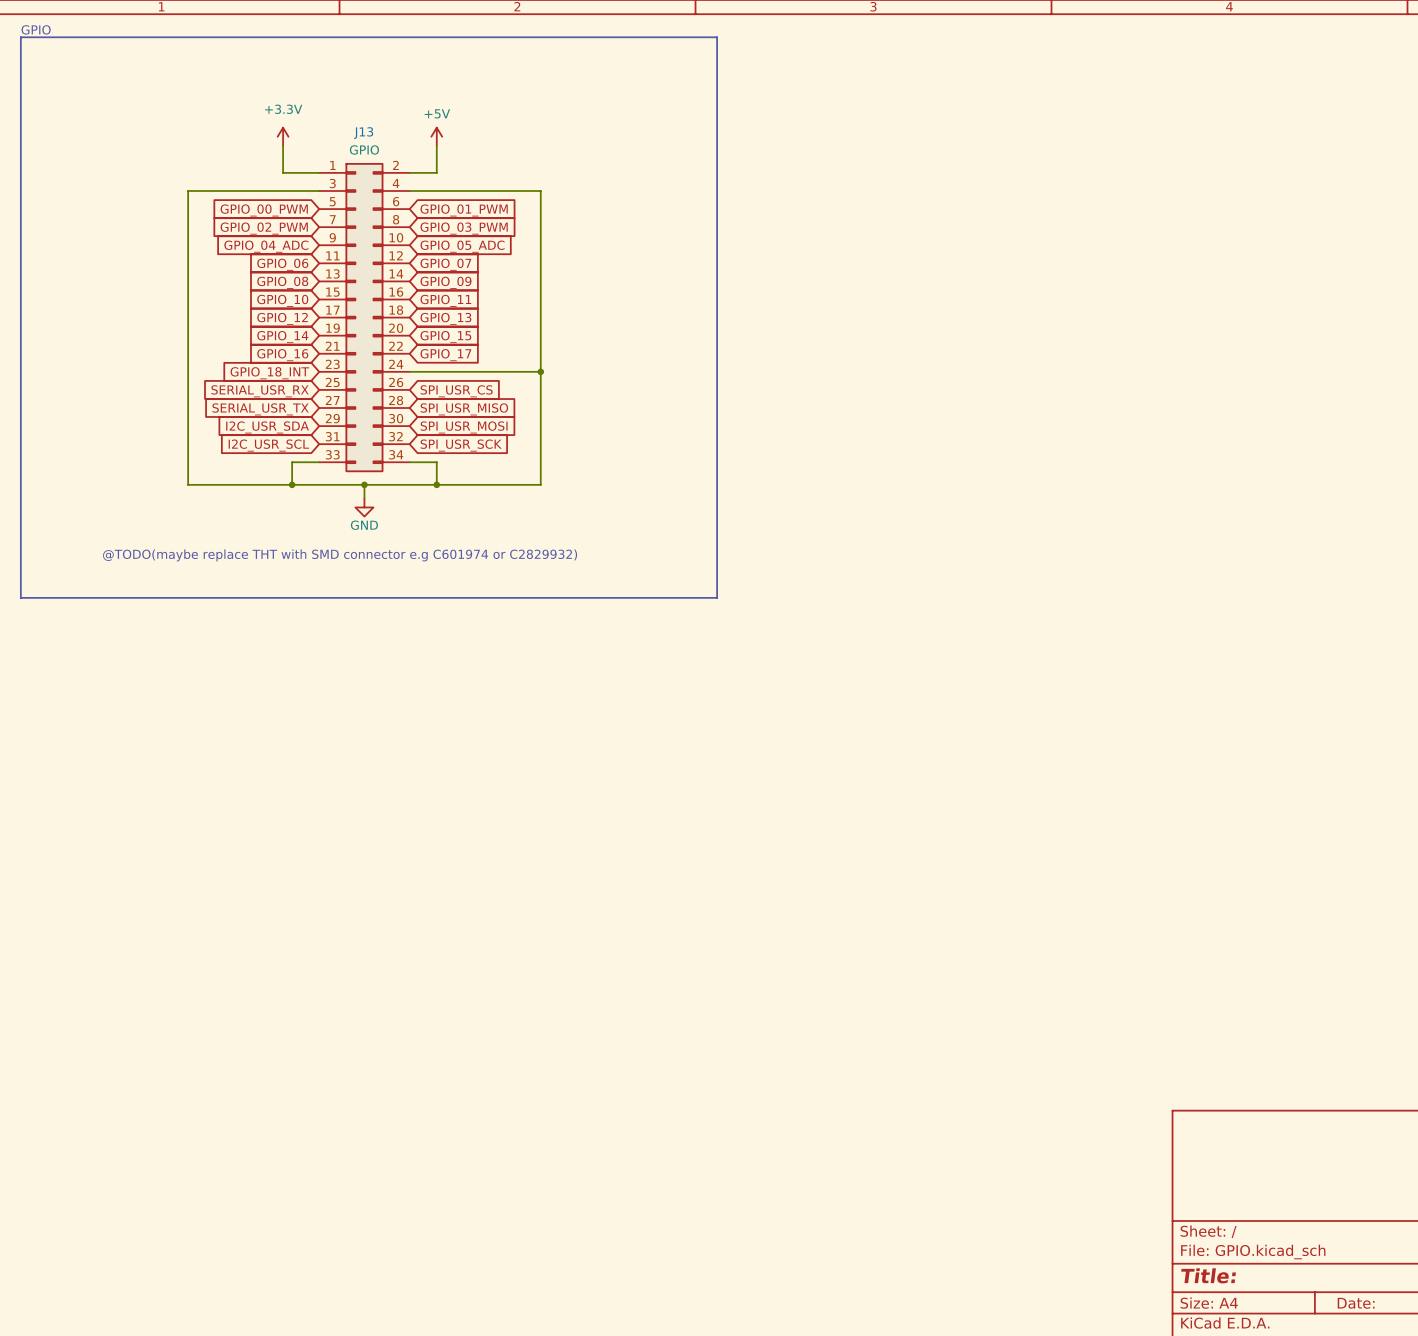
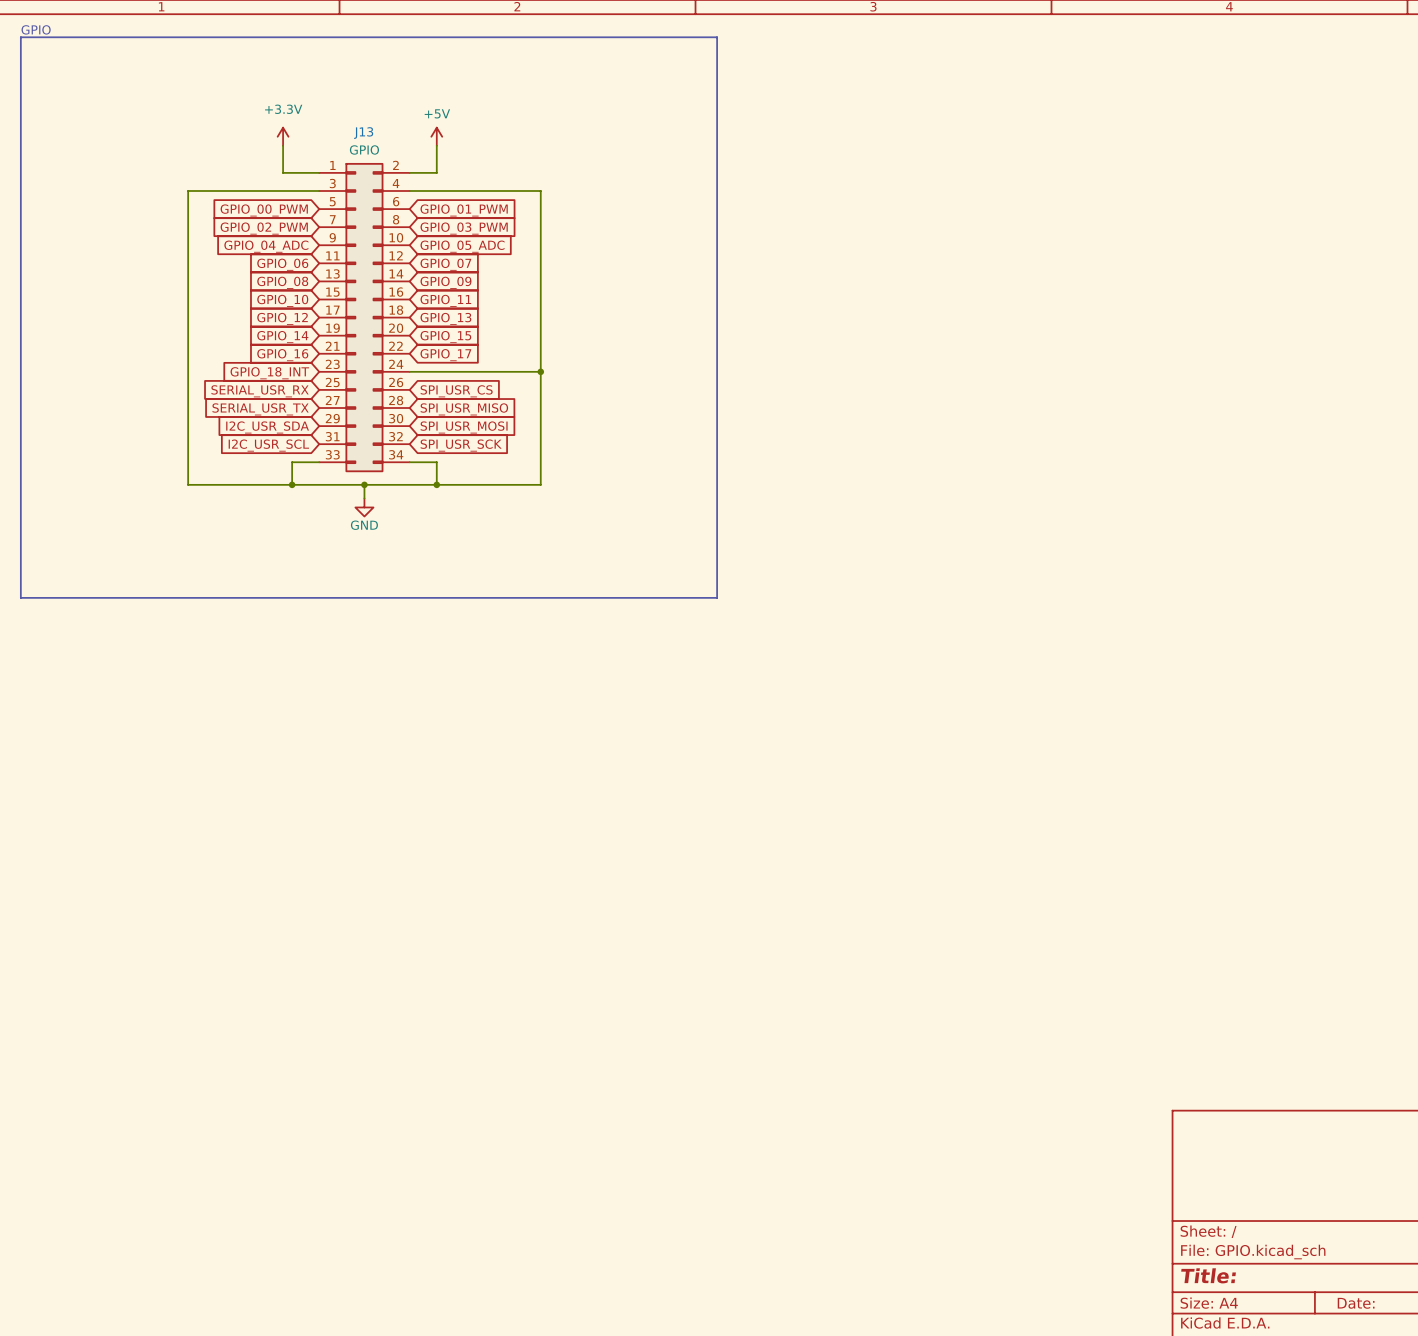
text: @TODO(maybe replace THT with SMD connector e.g C601974 or C2829932) (340, 555) -> none

